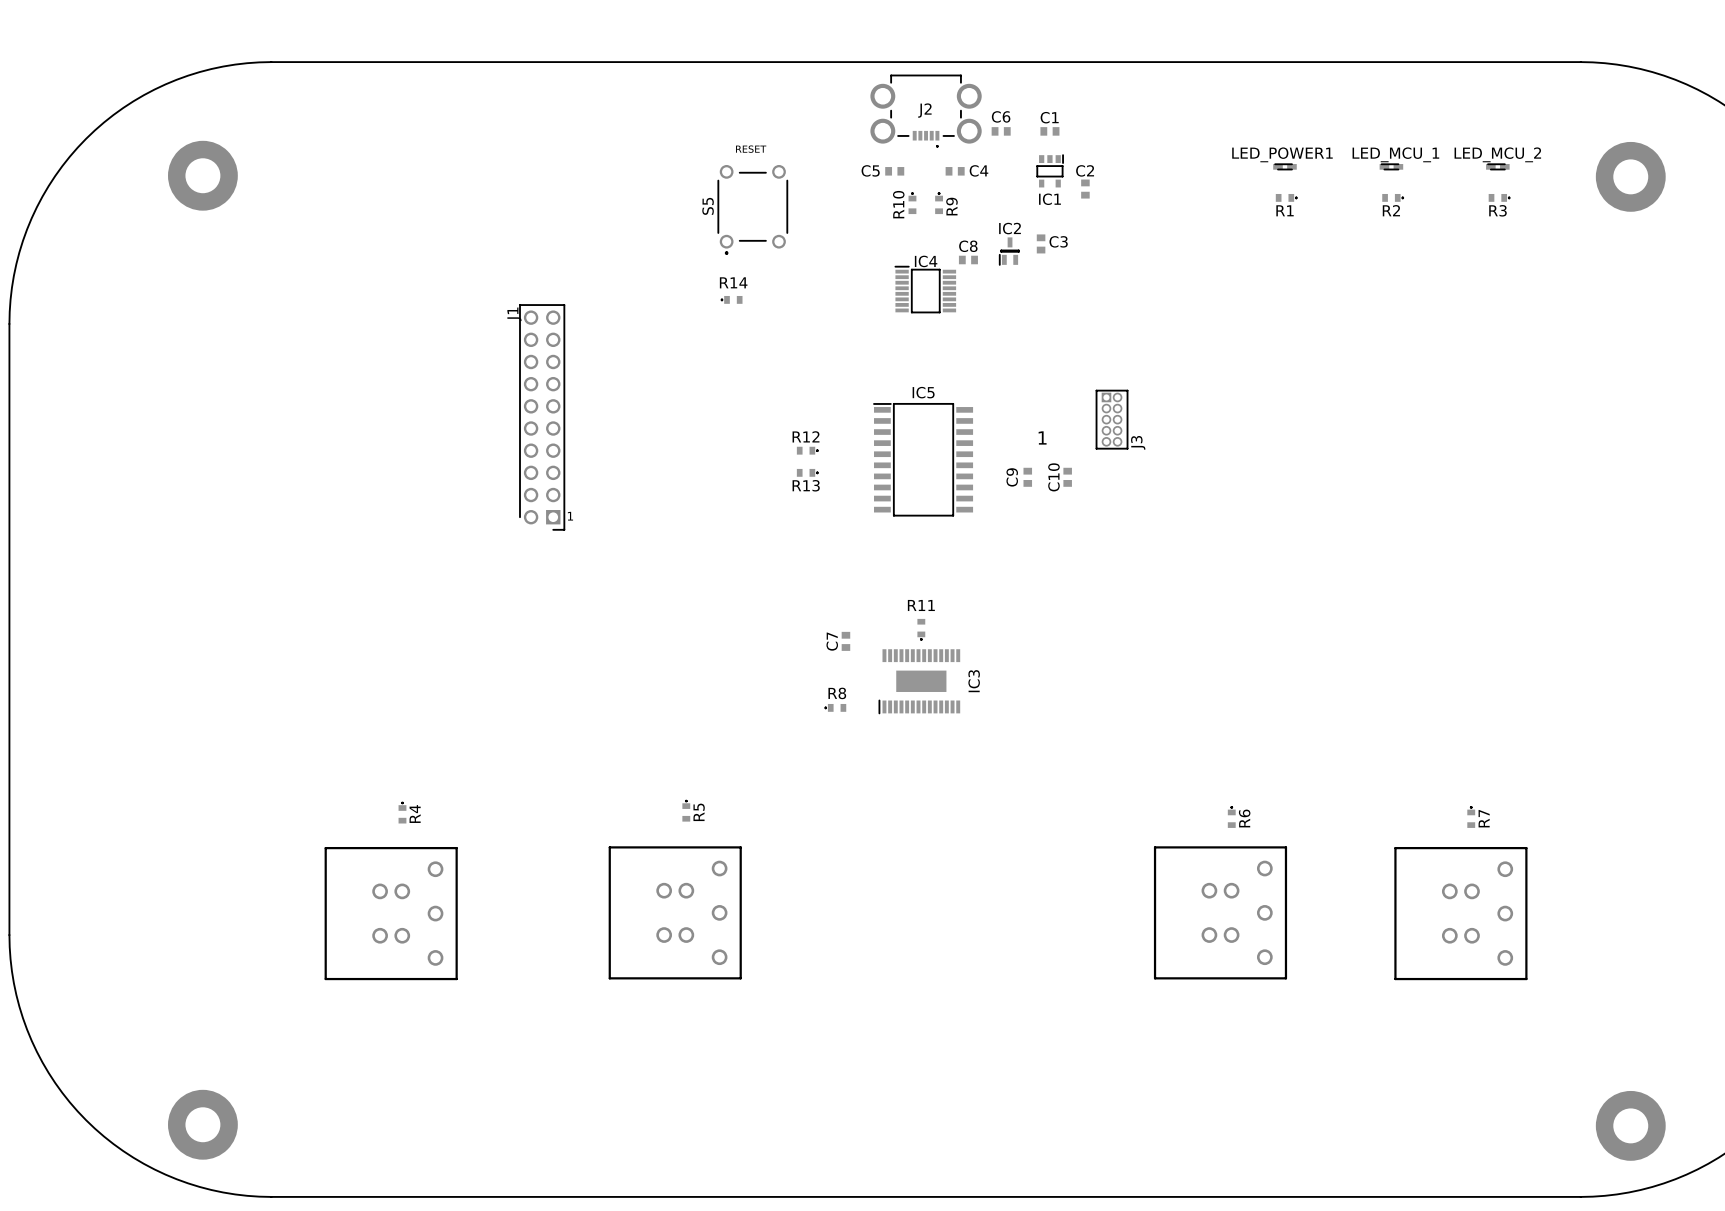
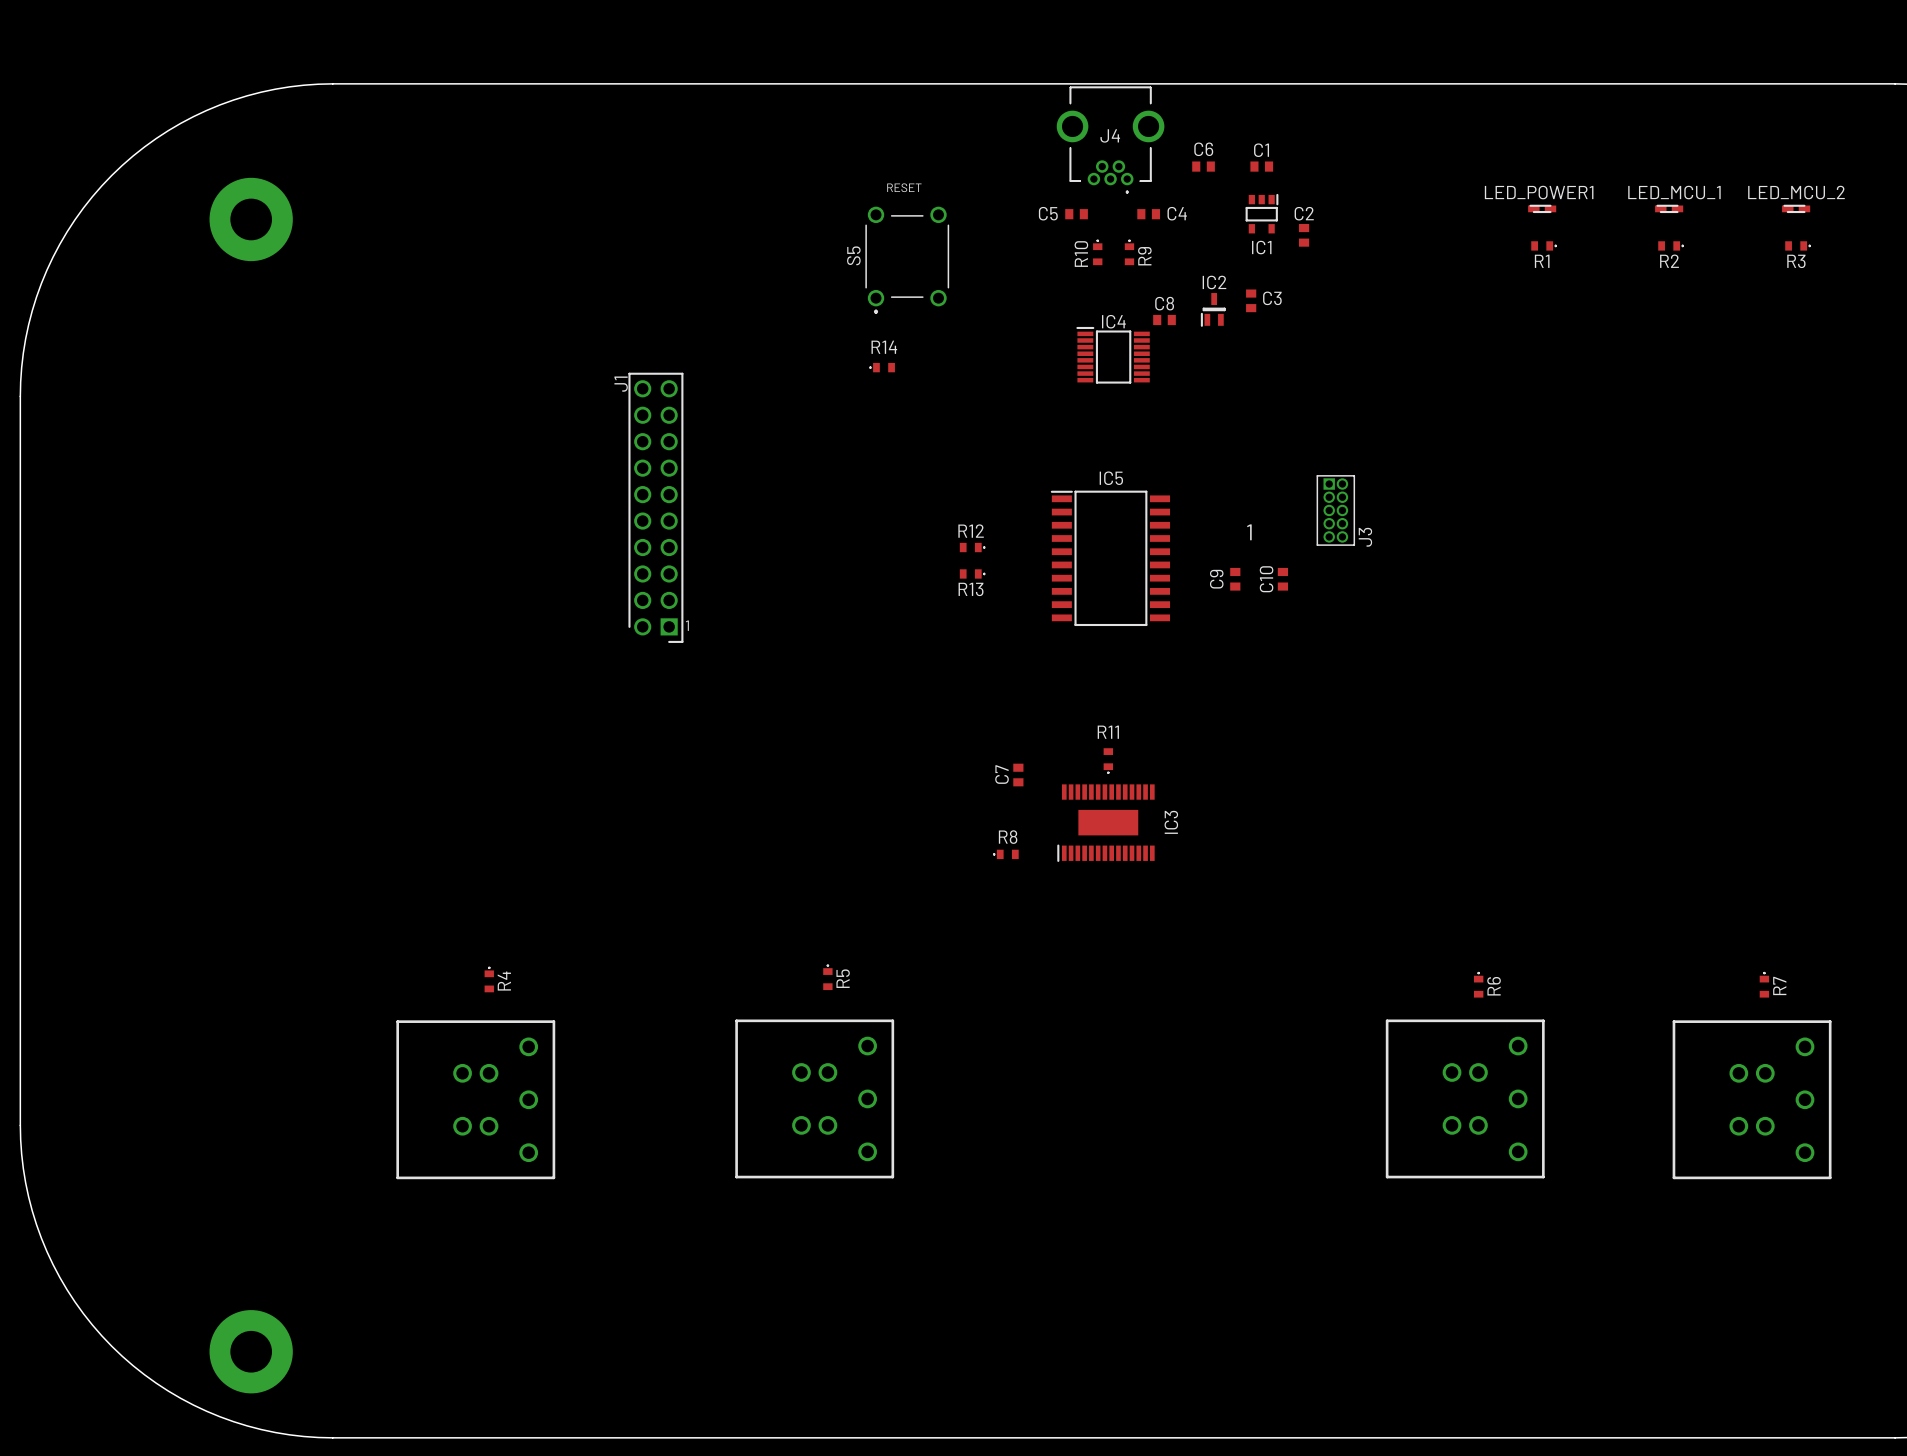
J4: none -> (1110, 140)
J2: (926, 110) -> none

